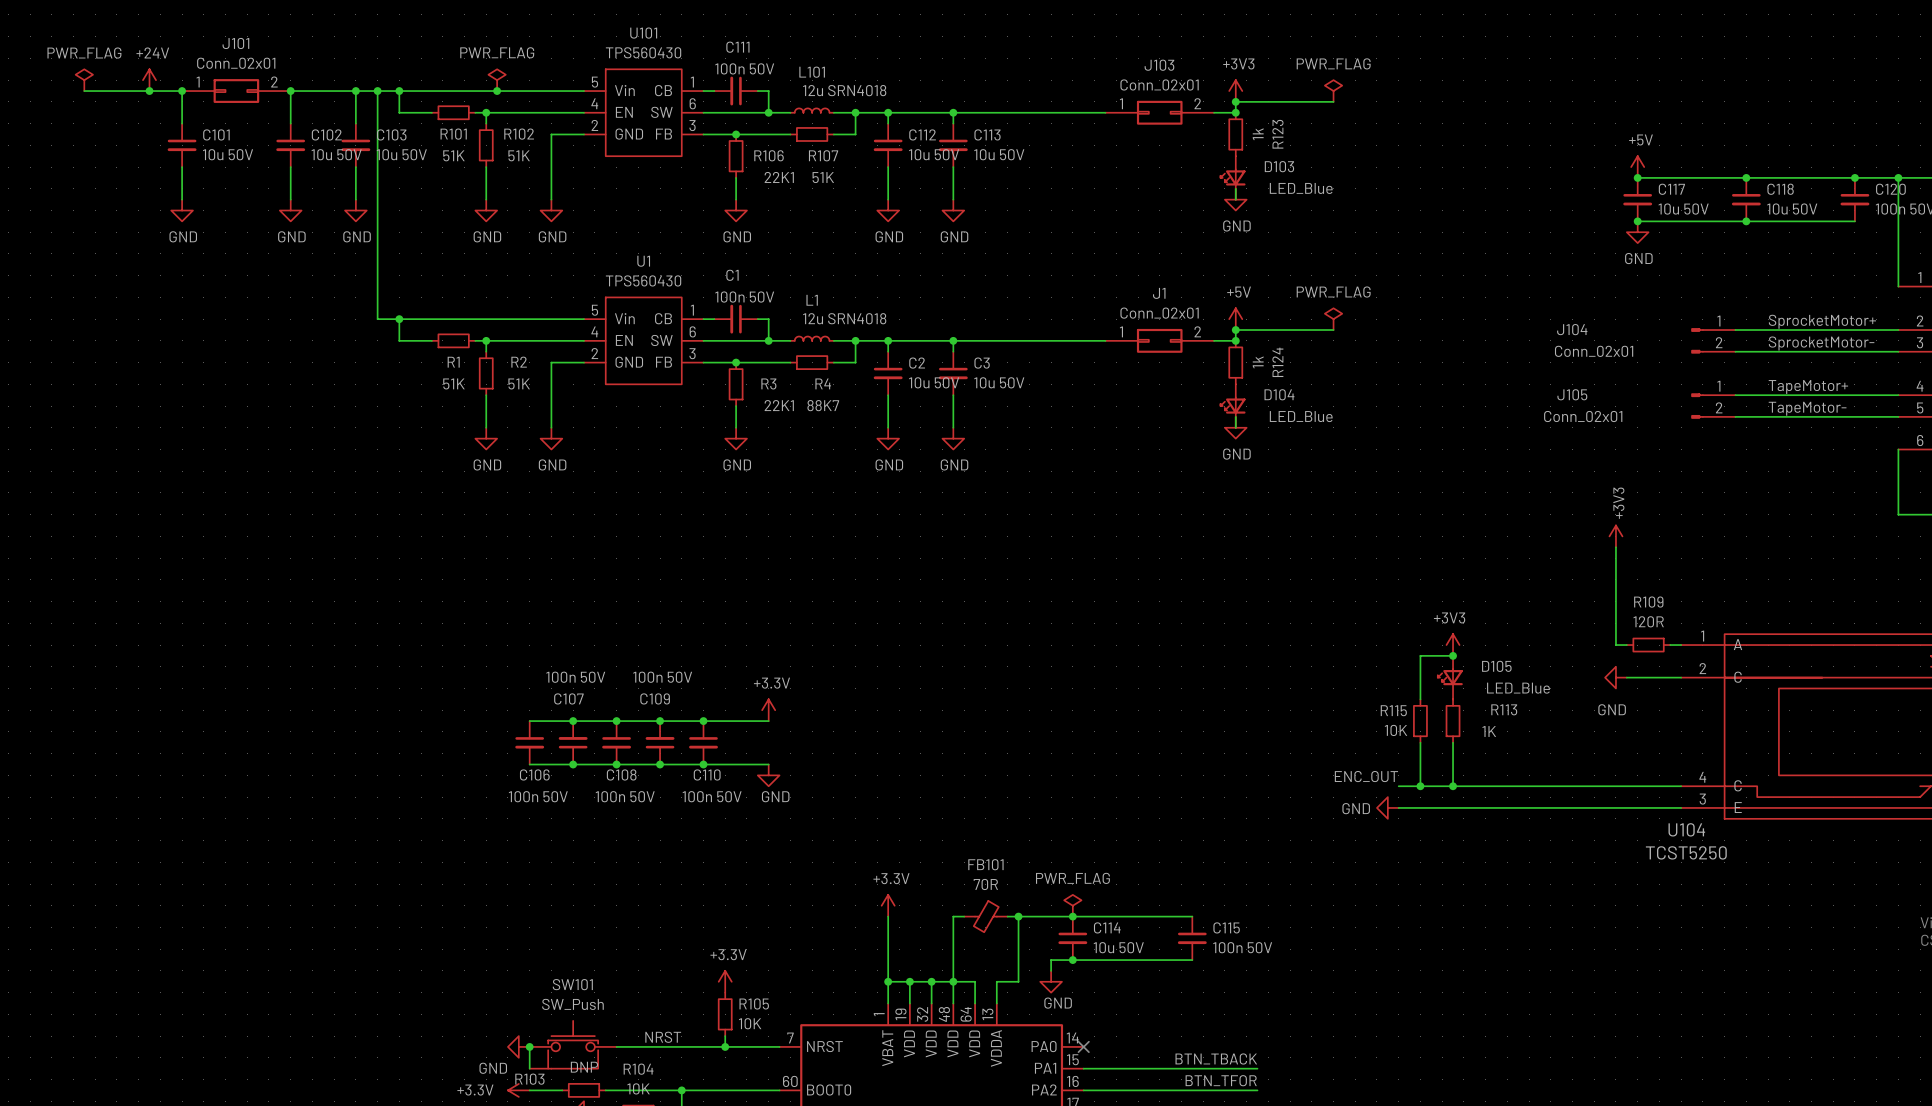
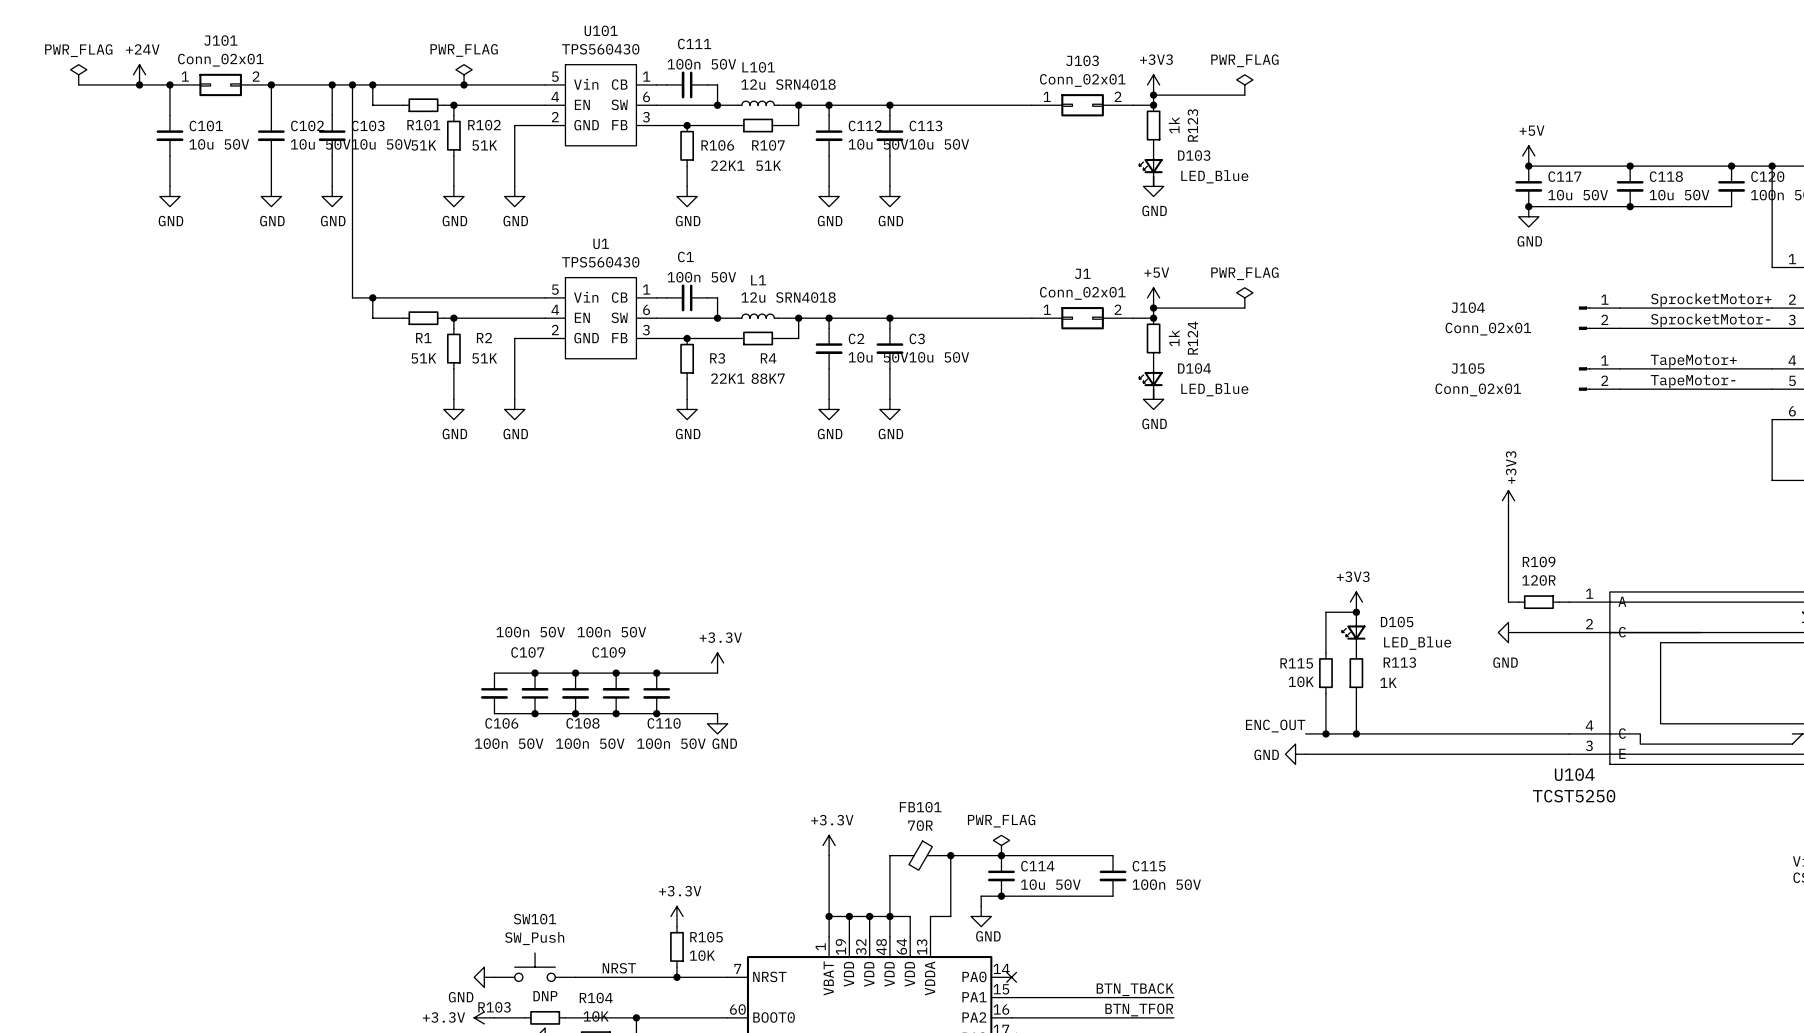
SW101 symbol: [529, 1020, 617, 1069] -> [494, 952, 576, 982]
wire: (529, 1046) (529, 1068) -> none
junction: (529, 1046) -> none

